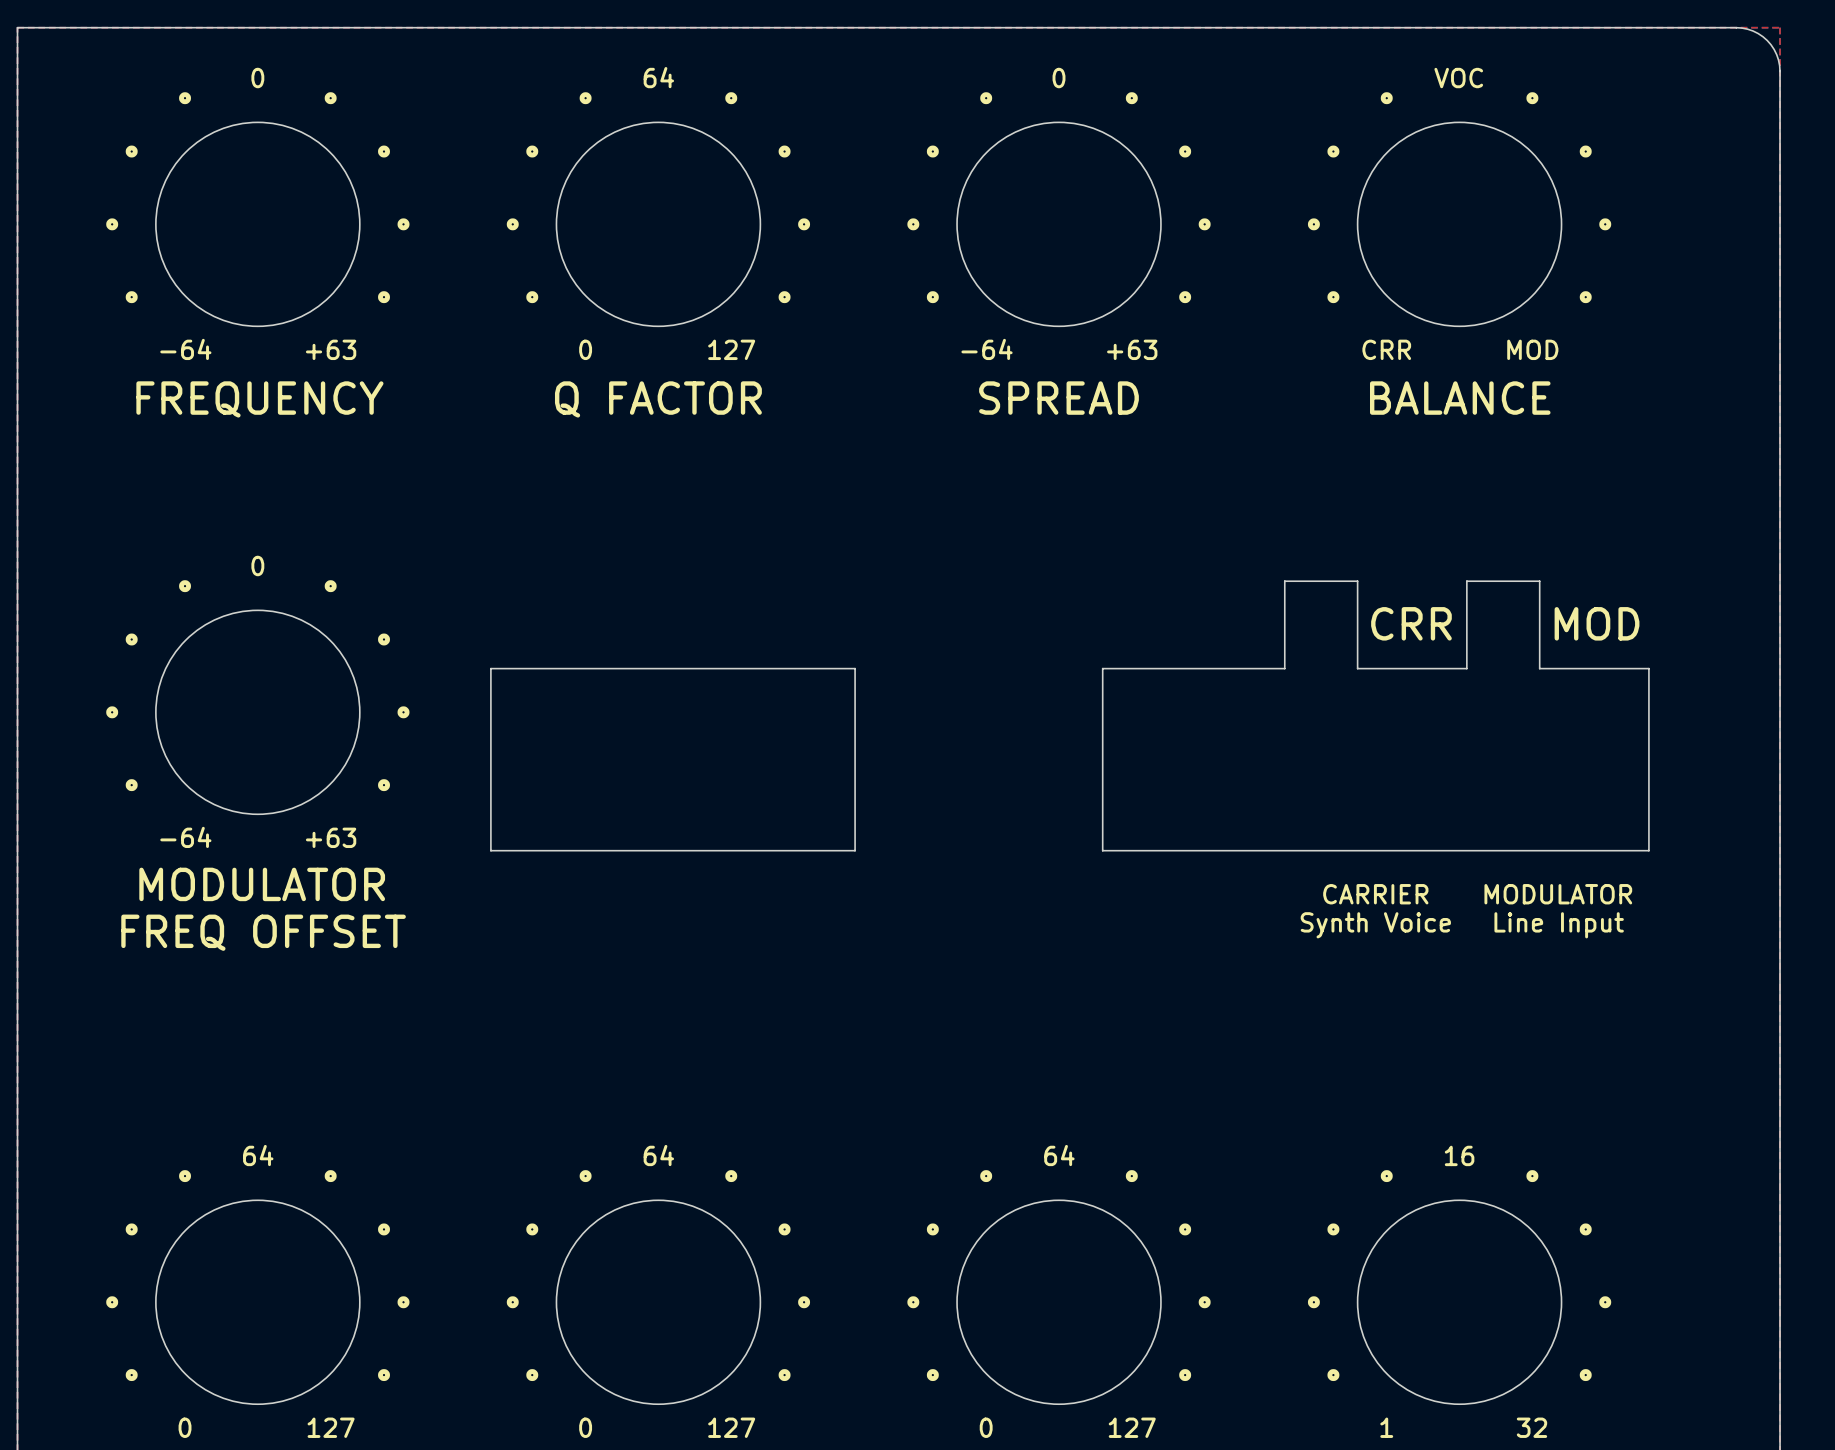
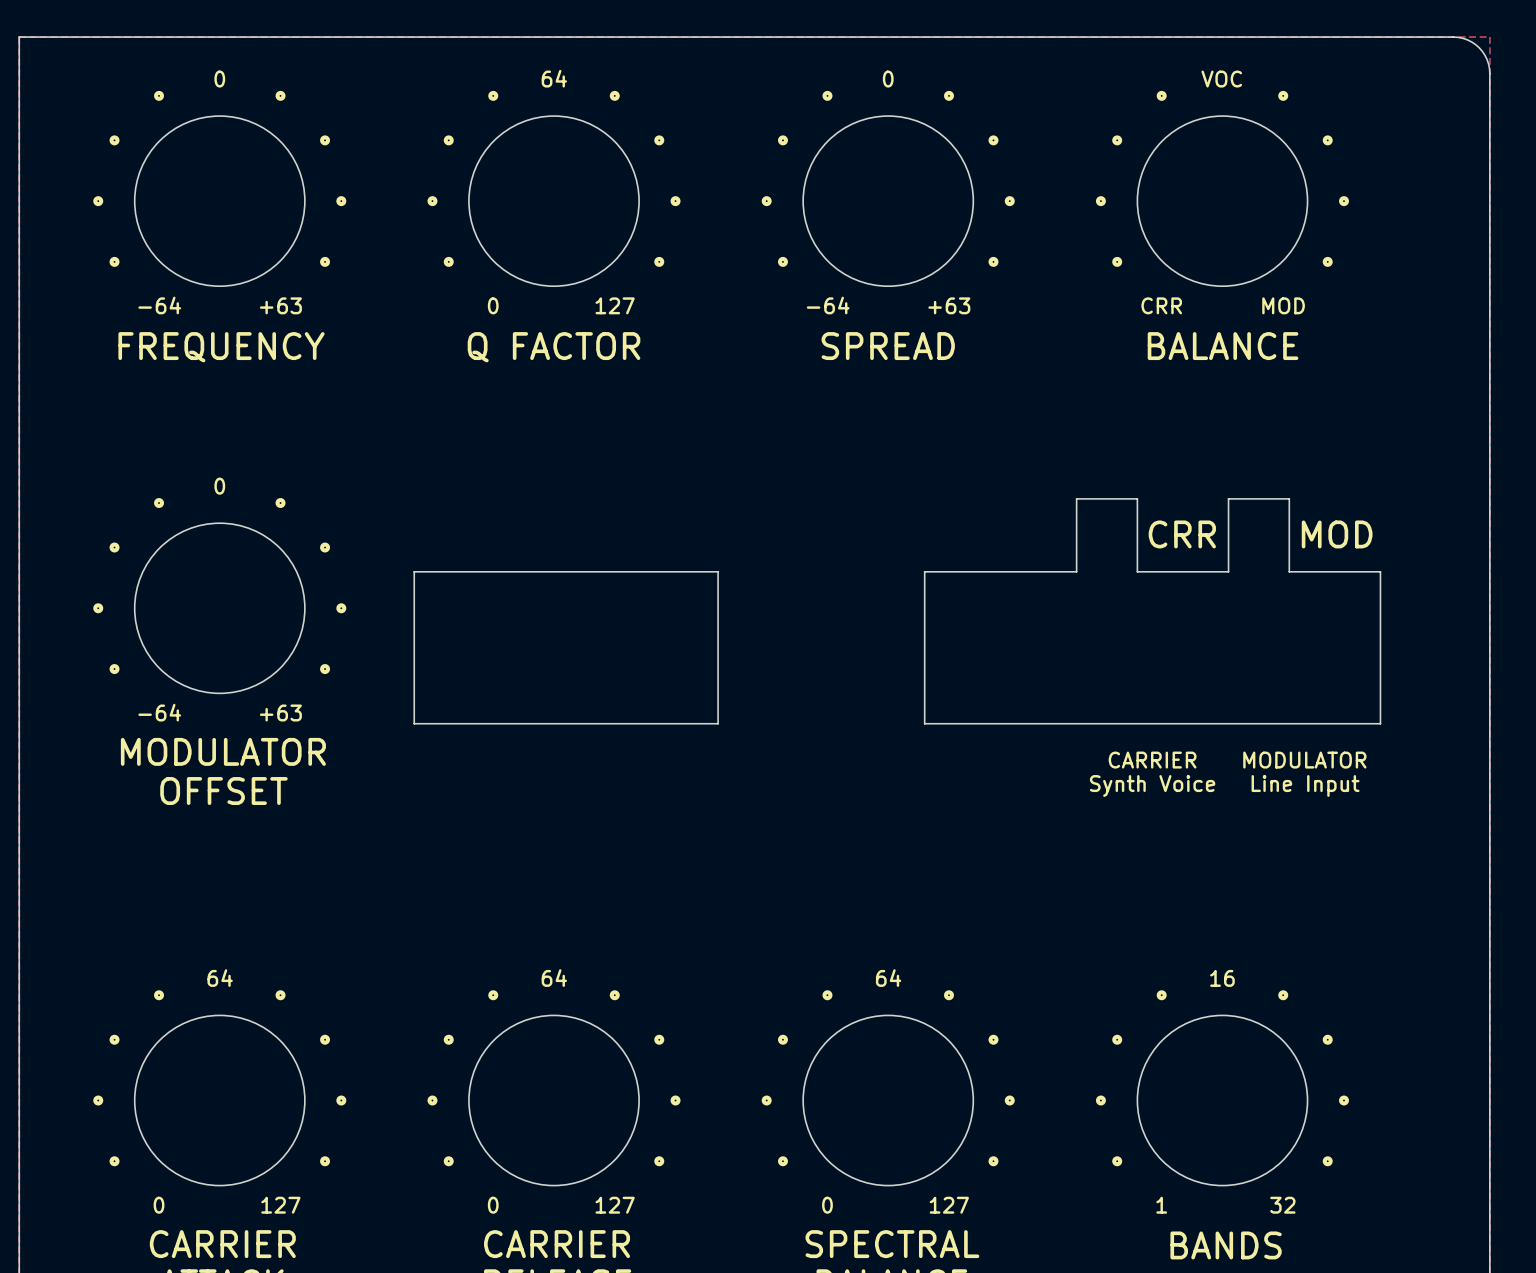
text: FREQ OFFSET (263, 932) -> OFFSET (223, 791)

